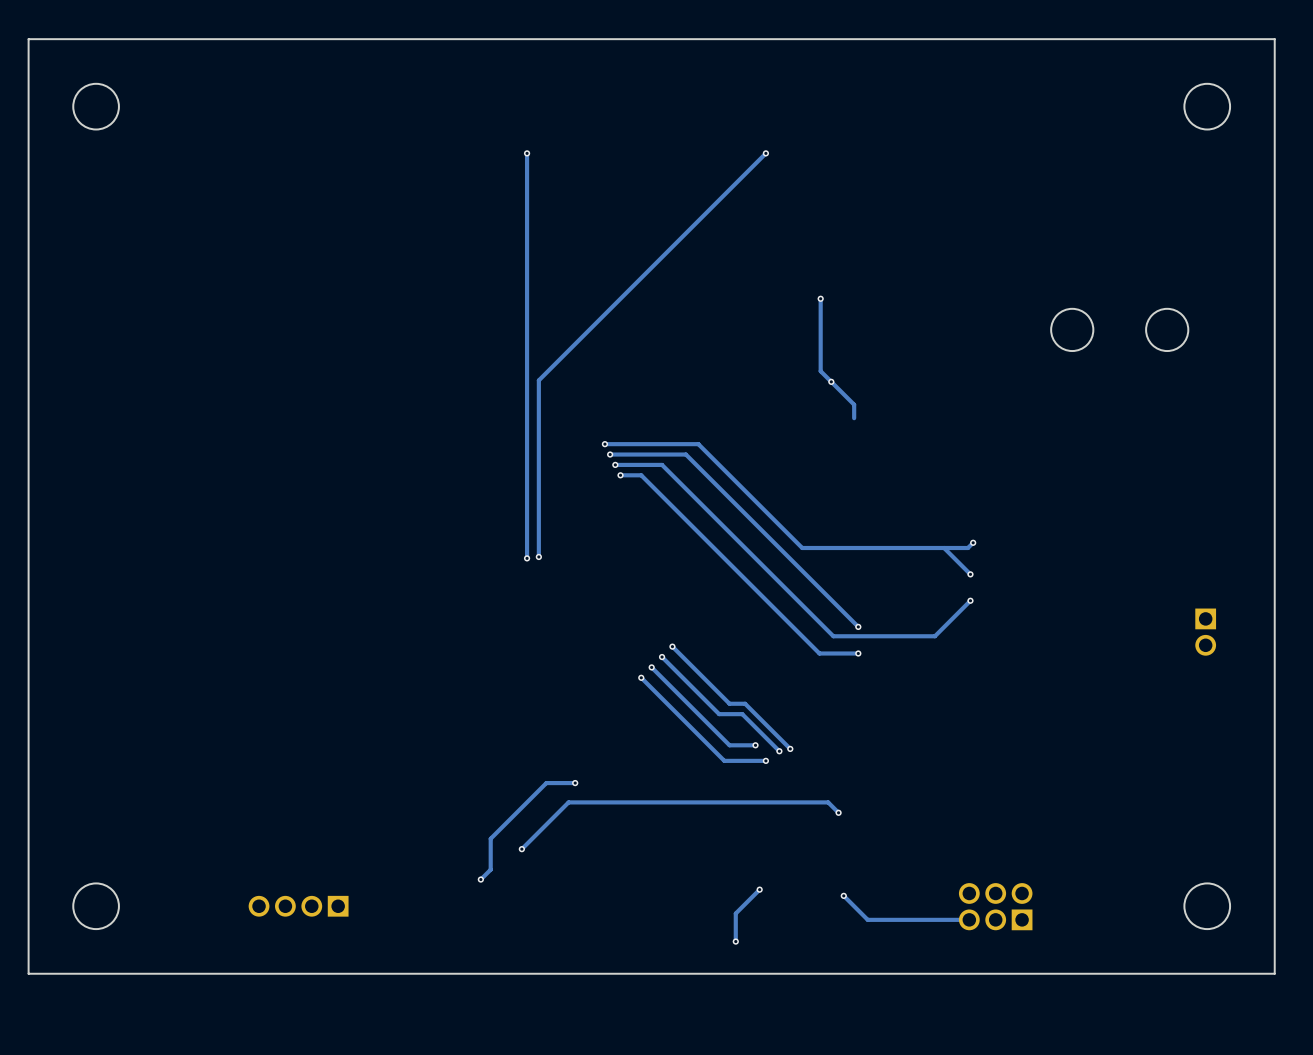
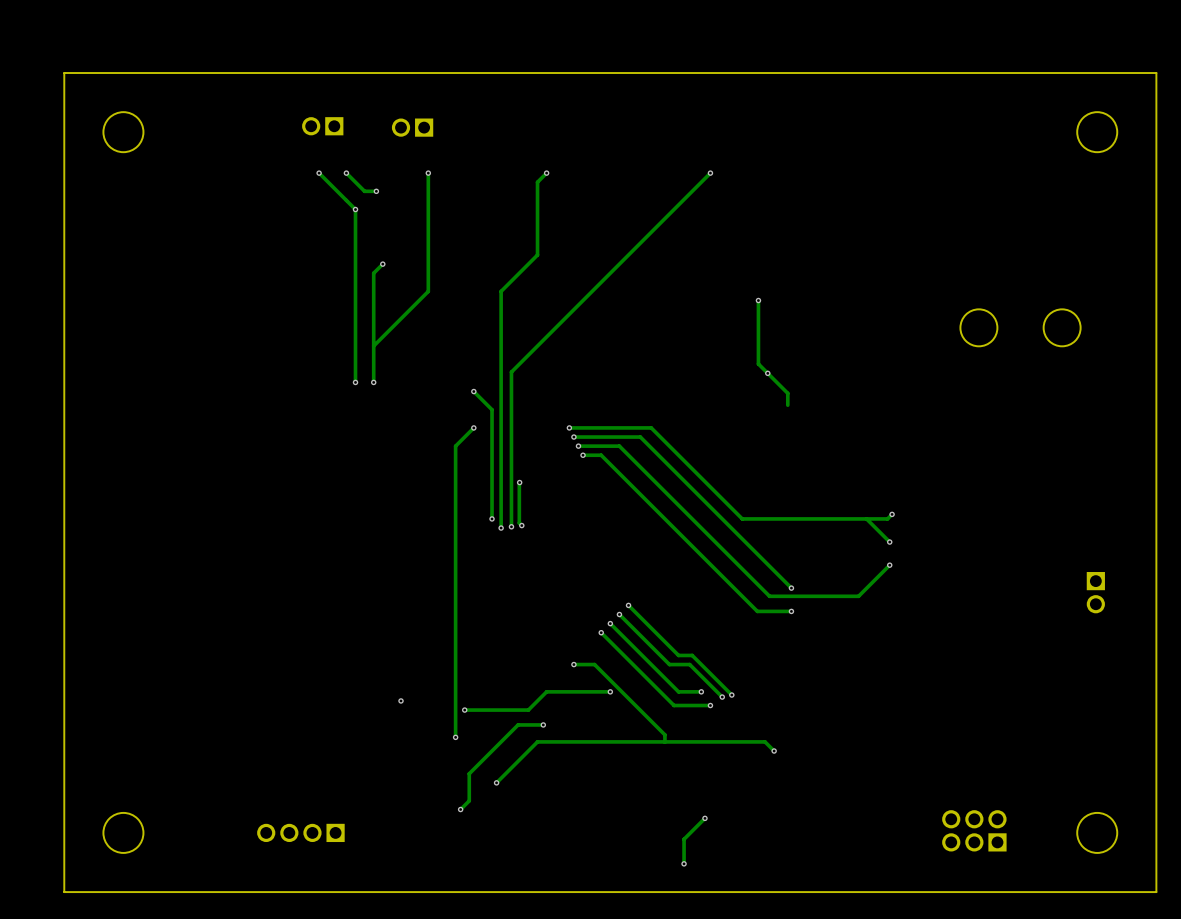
part: none -> (322, 126)
part: none -> (412, 127)
track: none -> (319, 173) (355, 209) (355, 382)
via: none -> (319, 173)
track: none -> (346, 173) (364, 191) (376, 191)
via: none -> (346, 173)
track: none -> (428, 173) (428, 291) (373, 346)
via: none -> (428, 173)
track: (527, 153) (527, 288) -> (546, 173) (537, 182) (537, 255) (501, 291)
via: (527, 153) -> none
via: none -> (546, 173)
via: none -> (376, 191)
via: none -> (355, 209)
track: none -> (382, 264) (373, 273) (373, 382)
via: none -> (382, 264)
via: none -> (355, 382)
via: none -> (373, 382)
track: none -> (473, 391) (492, 409) (492, 518)
via: none -> (473, 391)
track: none -> (473, 427) (455, 446) (455, 737)
via: none -> (473, 427)
track: none -> (519, 482) (519, 523) (521, 525)
via: none -> (519, 482)
via: none -> (492, 518)
via: none -> (521, 525)
track: none -> (573, 664) (594, 664) (664, 734) (664, 741)
via: none -> (573, 664)
track: none -> (610, 691) (546, 691) (528, 710) (464, 710)
via: none -> (610, 691)
via: none -> (401, 700)
via: none -> (464, 710)
via: none -> (455, 737)
track: (843, 895) (867, 919) (969, 919) -> none
via: (843, 895) -> none
part position: (995, 906) -> (974, 830)

